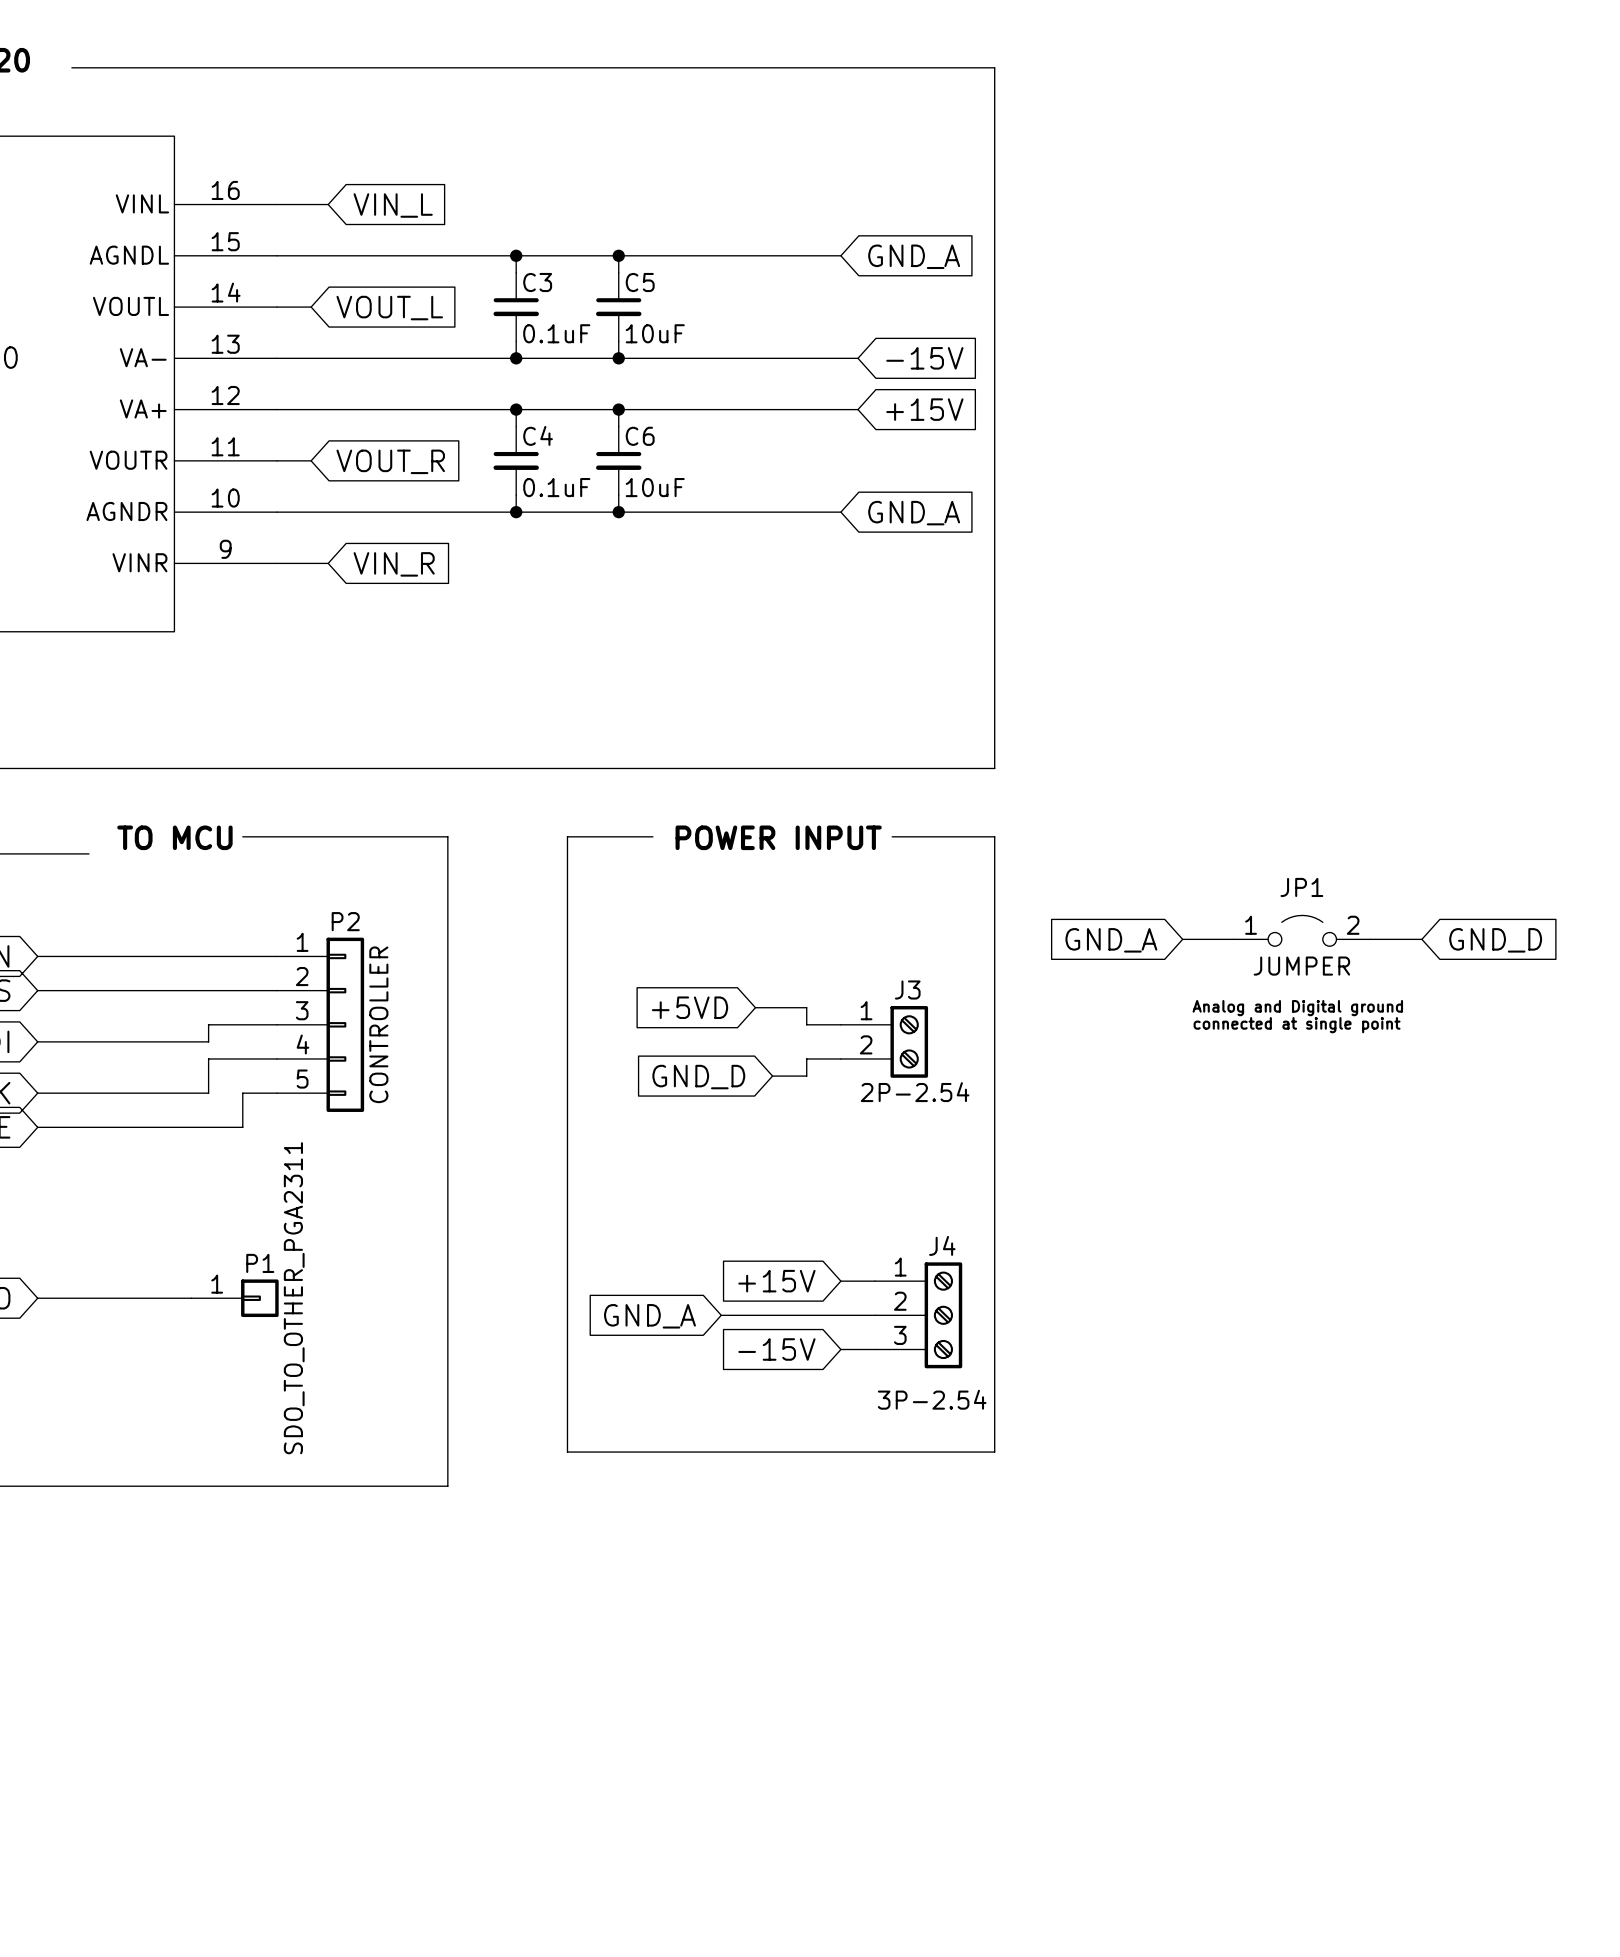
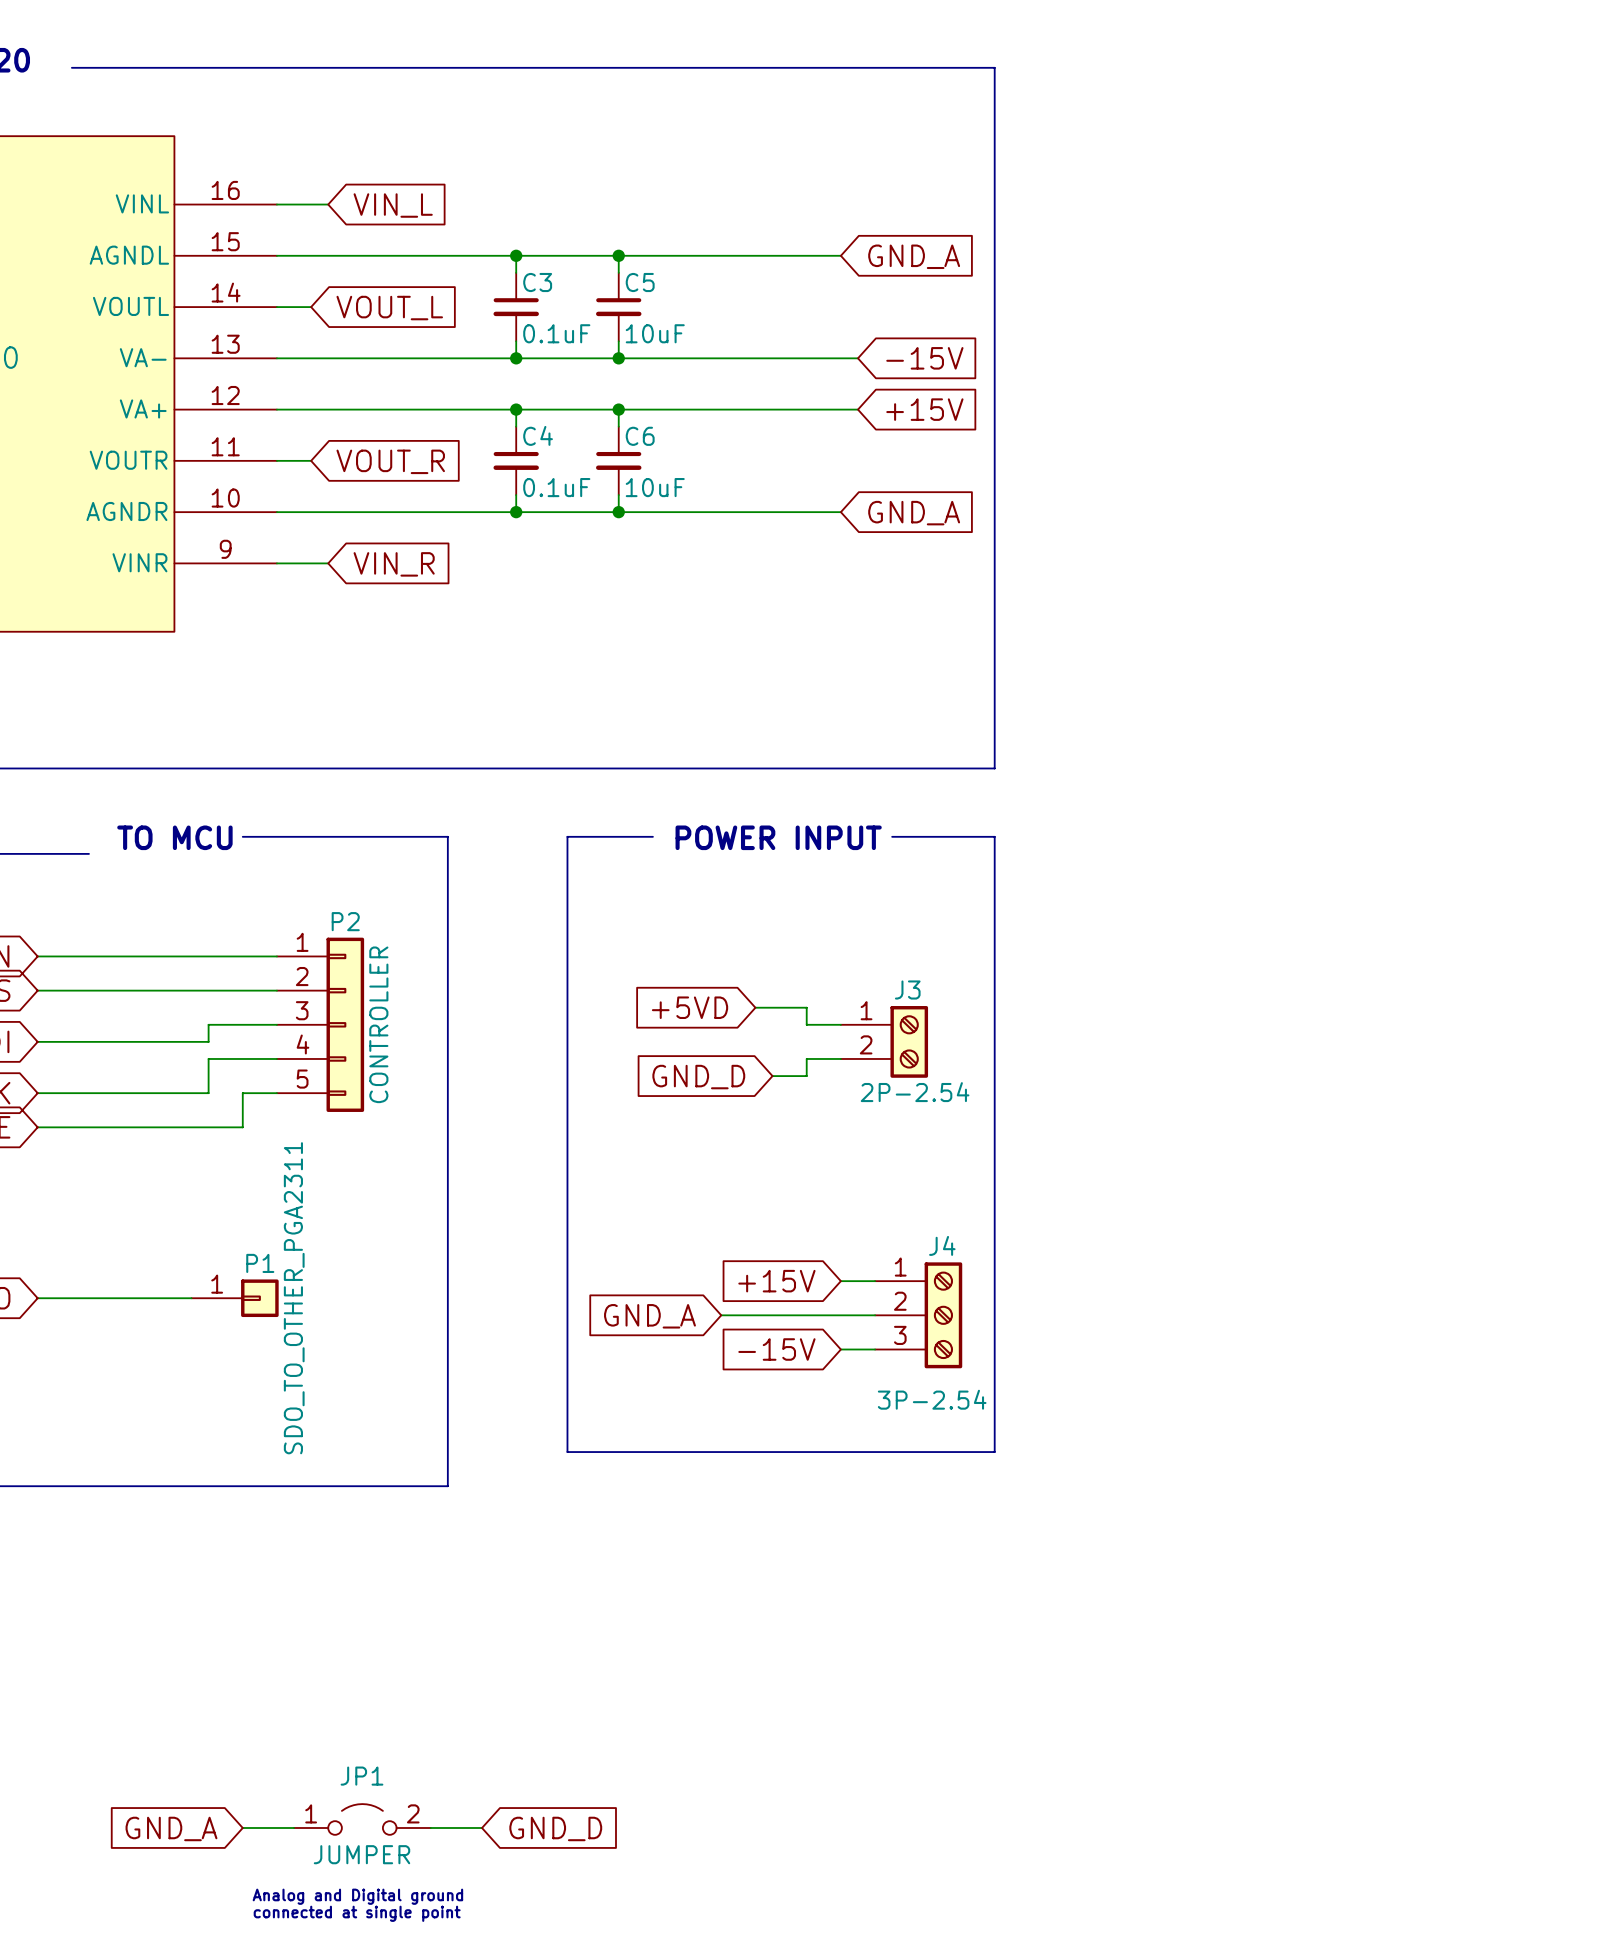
JP1 position: (1302, 930) -> (362, 1819)
wire: (1182, 939) (1233, 939) -> none
wire: (1370, 939) (1421, 939) -> none
global label: GND_A (1111, 940) -> none
global label: GND_D (1495, 940) -> none
text: Analog and Digital ground (1297, 1008) -> none
text: connected at single point (1297, 1025) -> none
wire: none -> (242, 1827) (294, 1827)
wire: none -> (430, 1827) (482, 1827)
global label: none -> GND_A (171, 1828)
global label: none -> GND_D (555, 1828)
text: none -> Analog and Digital ground (357, 1896)
text: none -> connected at single point (357, 1913)

